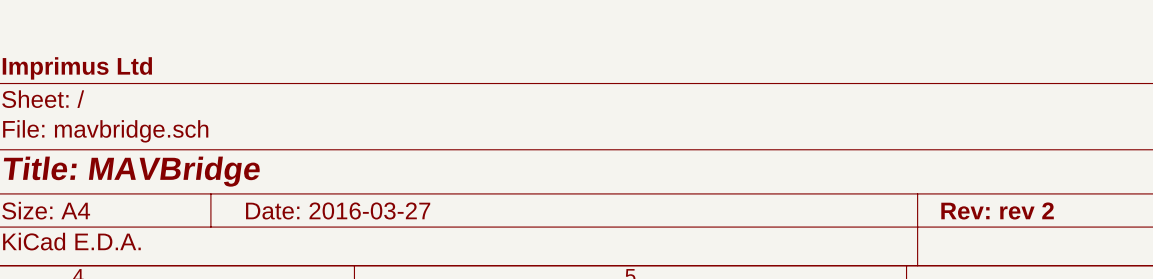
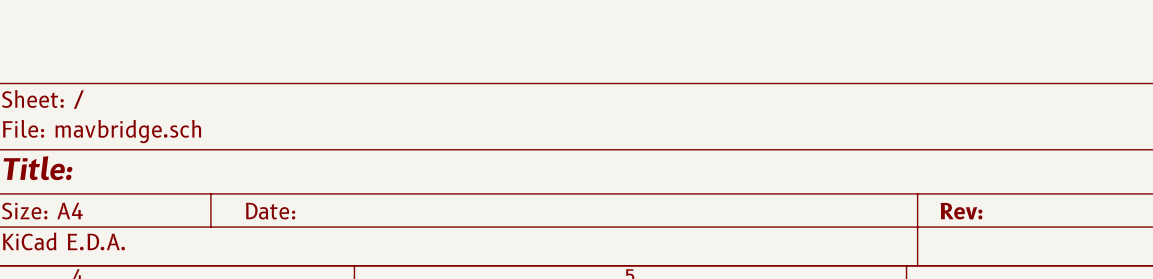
title block: Imprimus Ltd (77, 68) -> none
title block: Title: MAVBridge (131, 171) -> Title: (38, 168)
title block: Date: 2016-03-27 (338, 210) -> Date: (270, 211)
title block: Rev: rev 2 (997, 210) -> Rev: (961, 211)

